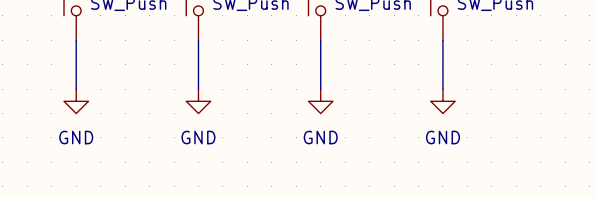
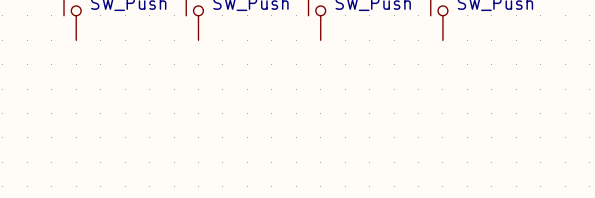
wire: (76, 40) (76, 89) -> none
wire: (198, 40) (198, 89) -> none
wire: (320, 40) (320, 89) -> none
wire: (442, 40) (442, 89) -> none
power symbol: GND (76, 101) -> none
power symbol: GND (198, 101) -> none
power symbol: GND (320, 101) -> none
power symbol: GND (442, 101) -> none

